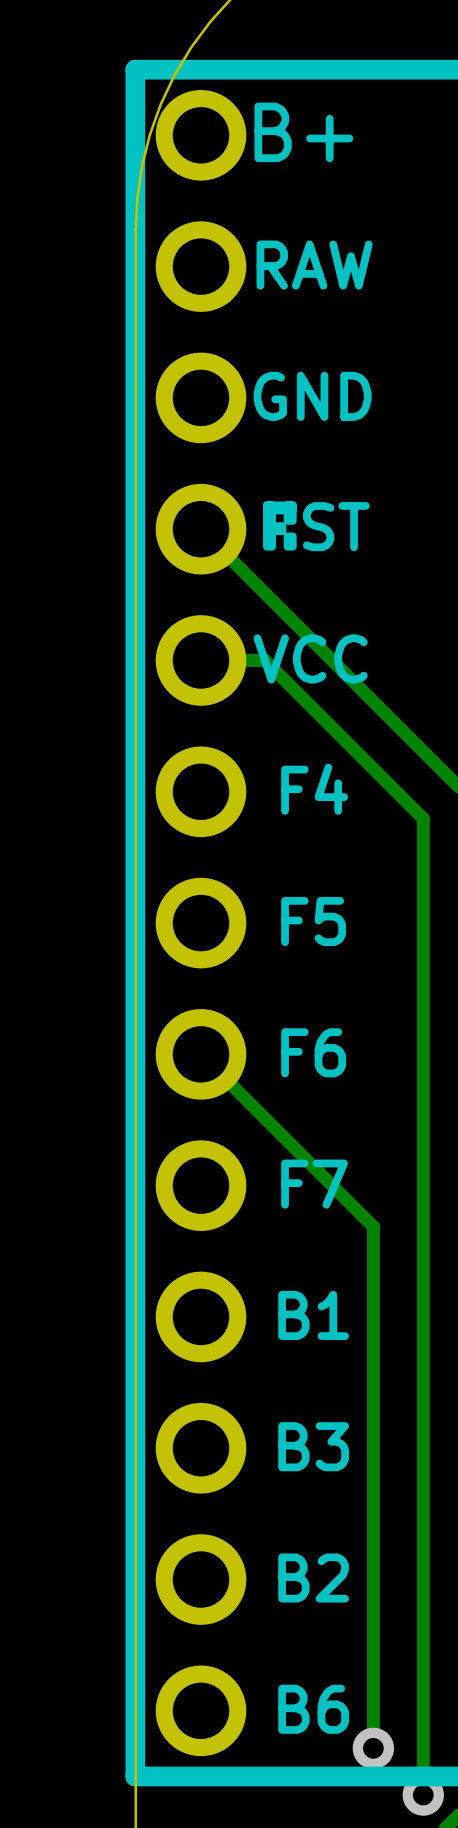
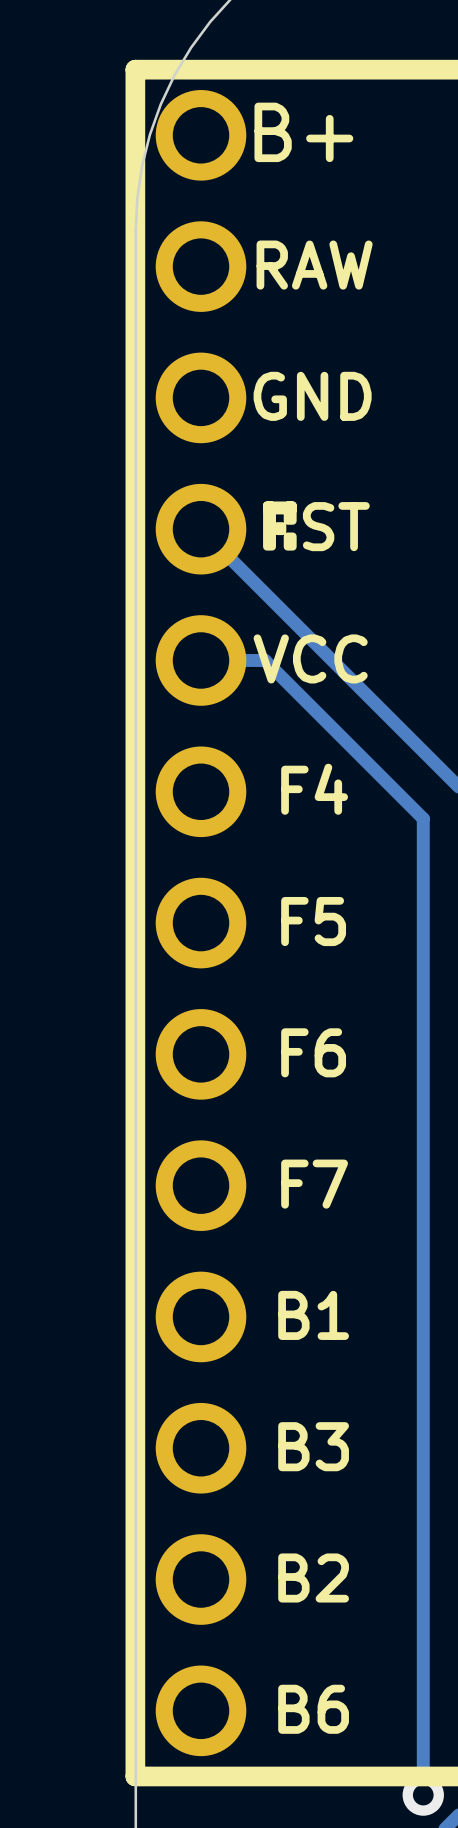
track: (201, 1054) (373, 1226) (373, 1748) -> none
via: (373, 1748) -> none

